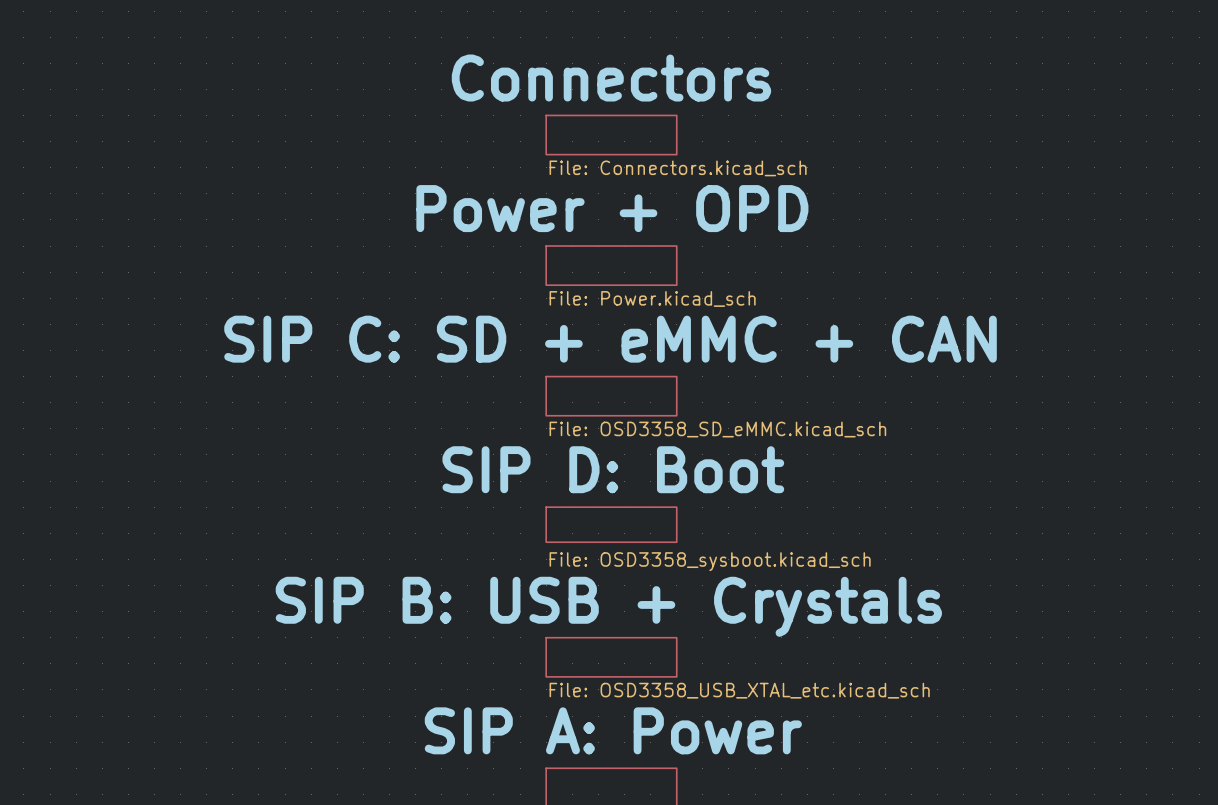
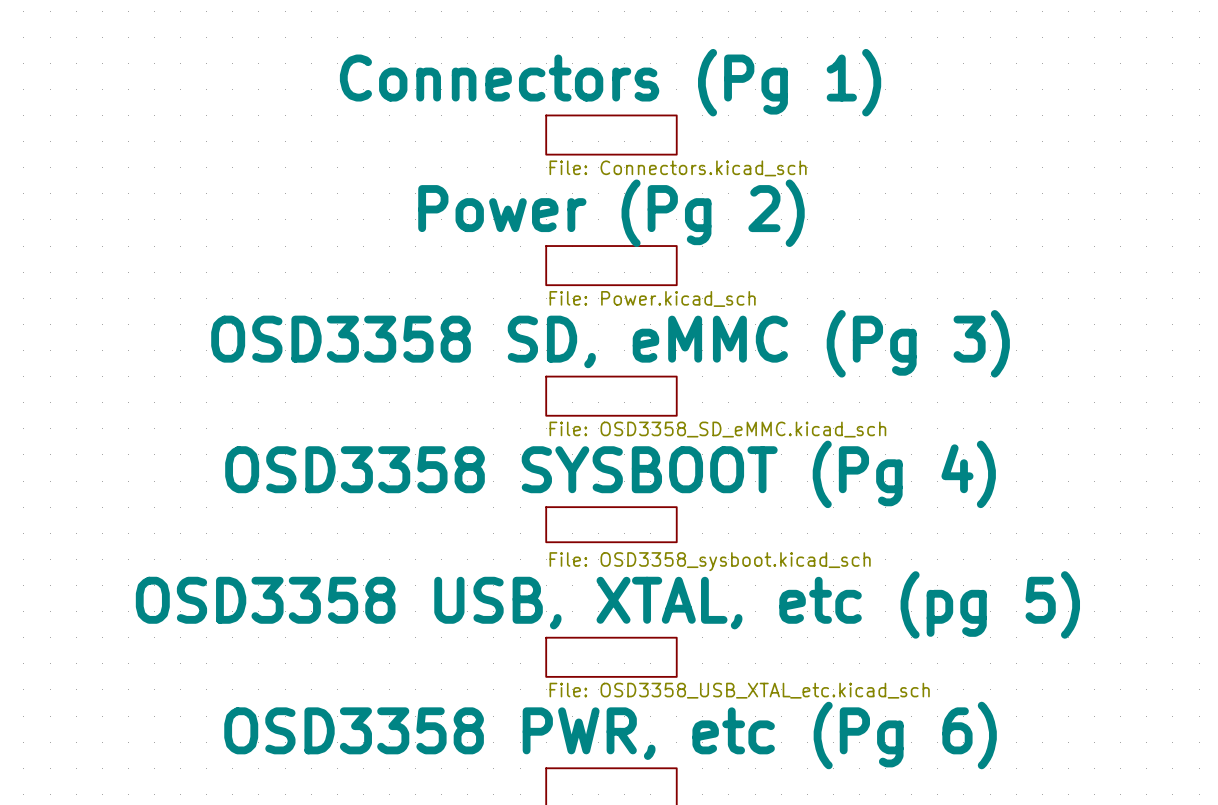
sheet Connectors name: Connectors (611, 78) -> Connectors (Pg 1) (610, 82)
sheet Power + OPD name: Power + OPD (612, 208) -> Power (Pg 2) (611, 213)
sheet OSD3358 SD, eMMC (Pg 3) name: SIP C: SD + eMMC + CAN (610, 339) -> OSD3358 SD, eMMC (Pg 3) (610, 343)
sheet OSD3358 SYSBOOT (Pg 4) name: SIP D: Boot (613, 469) -> OSD3358 SYSBOOT (Pg 4) (610, 474)
sheet OSD3358 USB, XTAL, etc (pg 5) name: SIP B: USB + Crystals (608, 606) -> OSD3358 USB, XTAL, etc (pg 5) (607, 604)
sheet OSD3358 PWR, etc (Pg 6) name: SIP A: Power (613, 730) -> OSD3358 PWR, etc (Pg 6) (610, 735)

